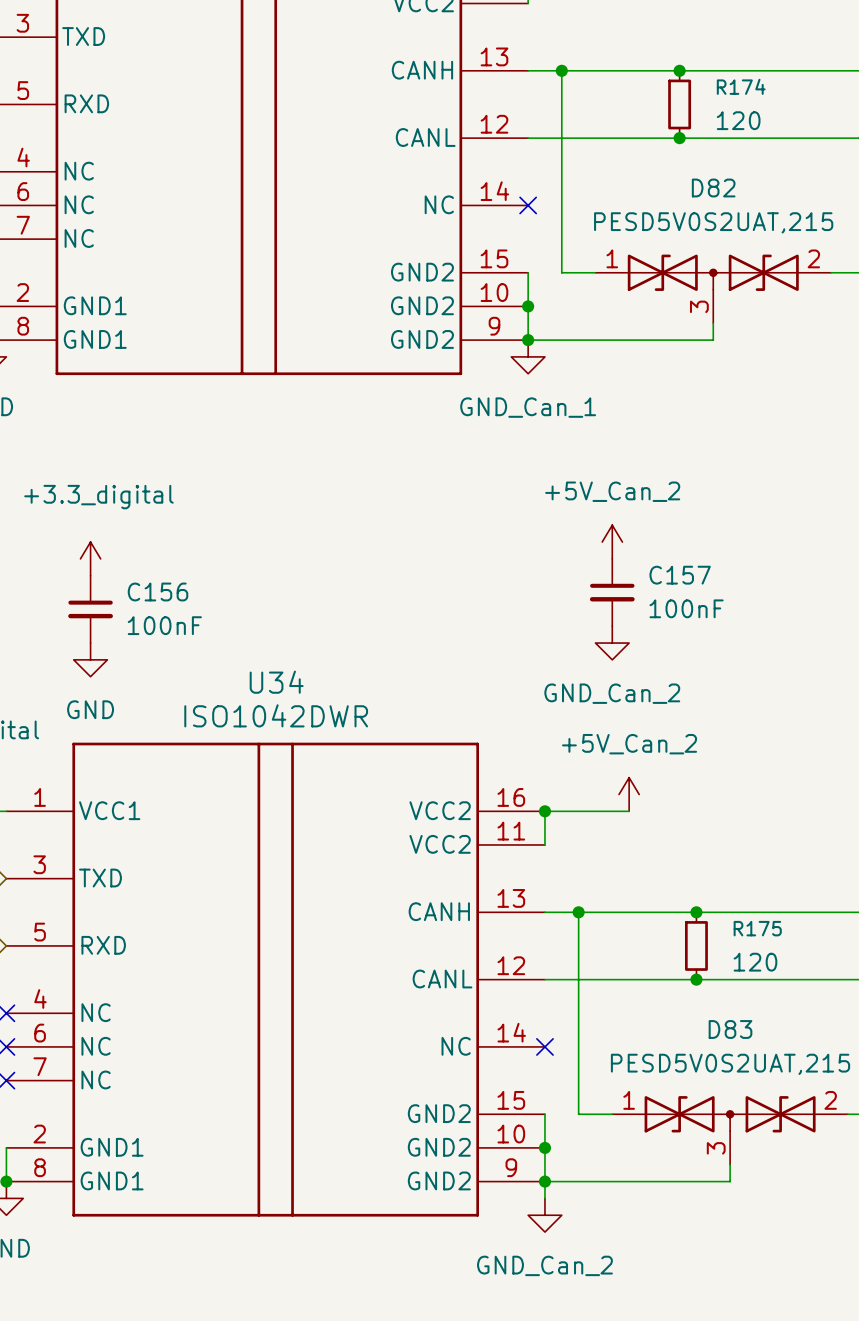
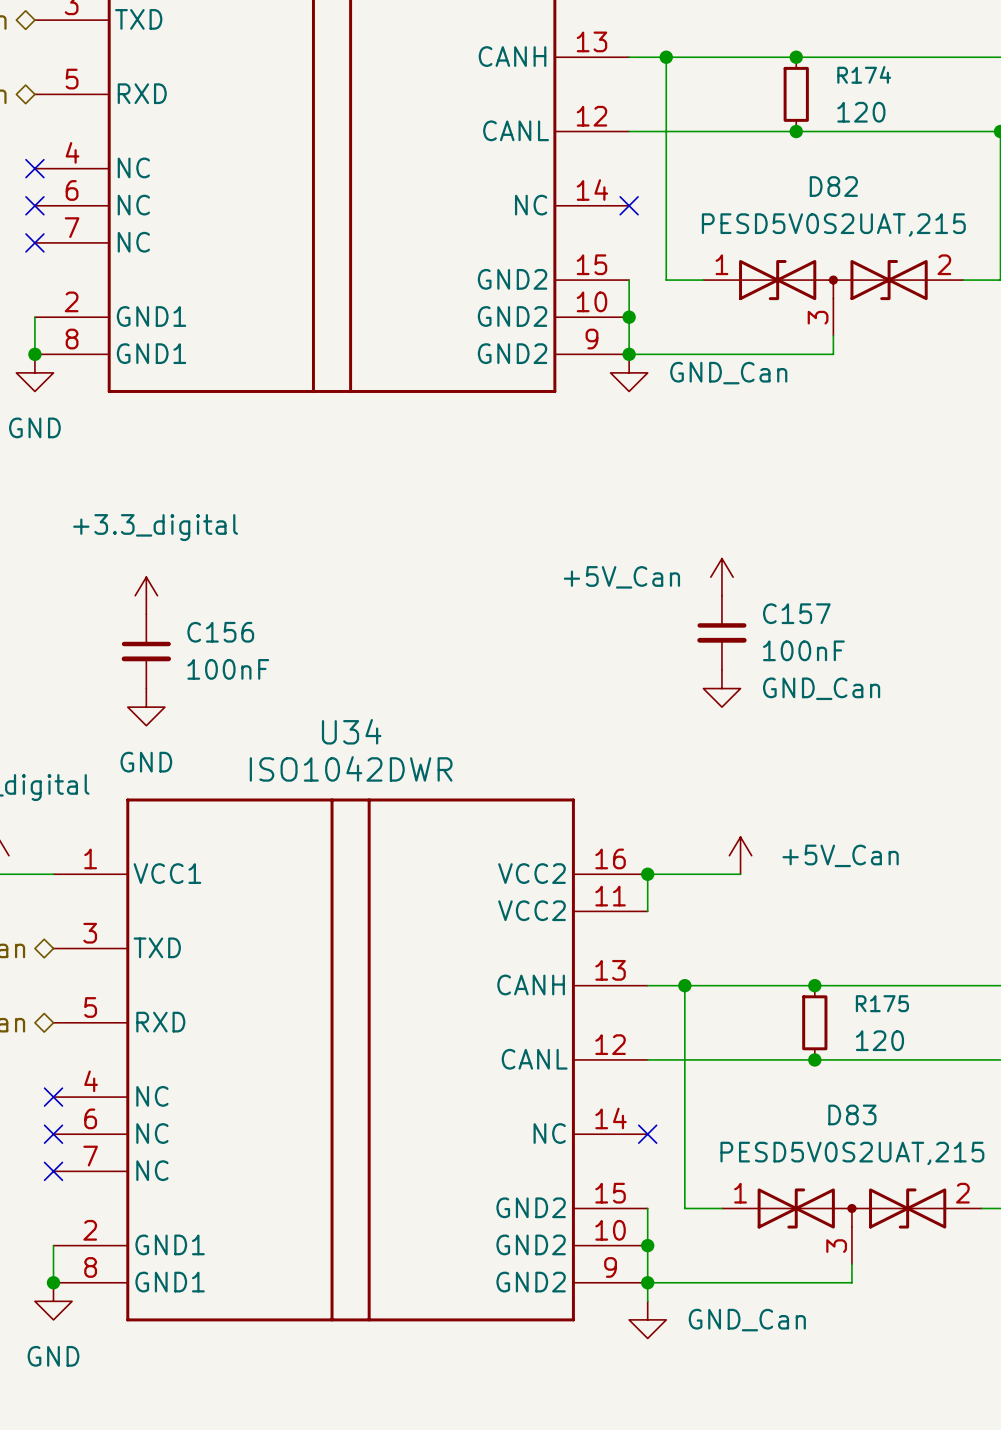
power symbol: GND_Can_1 (528, 356) -> GND_Can (629, 372)
power symbol: +5V_Can_2 (612, 542) -> +5V_Can (721, 577)
power symbol: GND_Can_2 (612, 643) -> GND_Can (721, 688)
power symbol: +5V_Can_2 (629, 794) -> +5V_Can (740, 855)
power symbol: GND_Can_2 (544, 1215) -> GND_Can (647, 1319)

